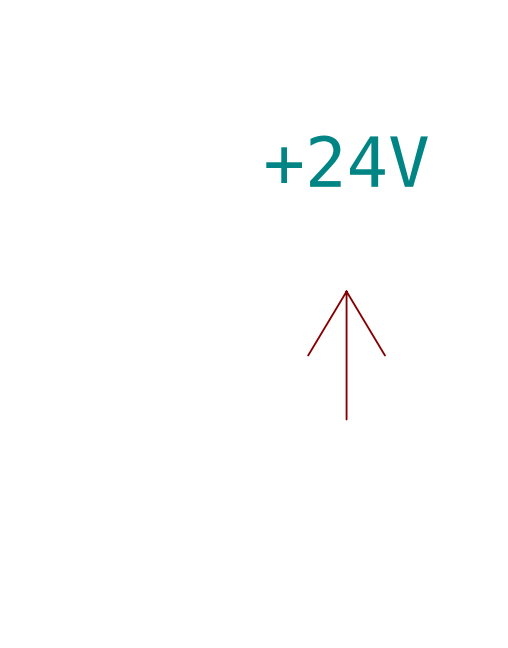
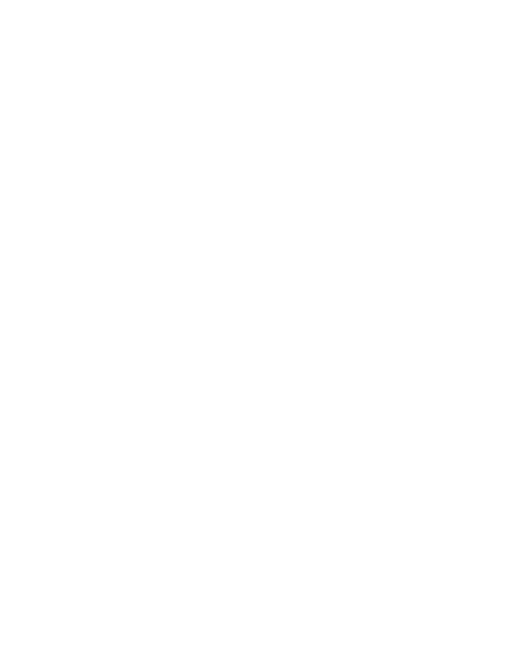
power symbol: +24V (346, 355) -> none

